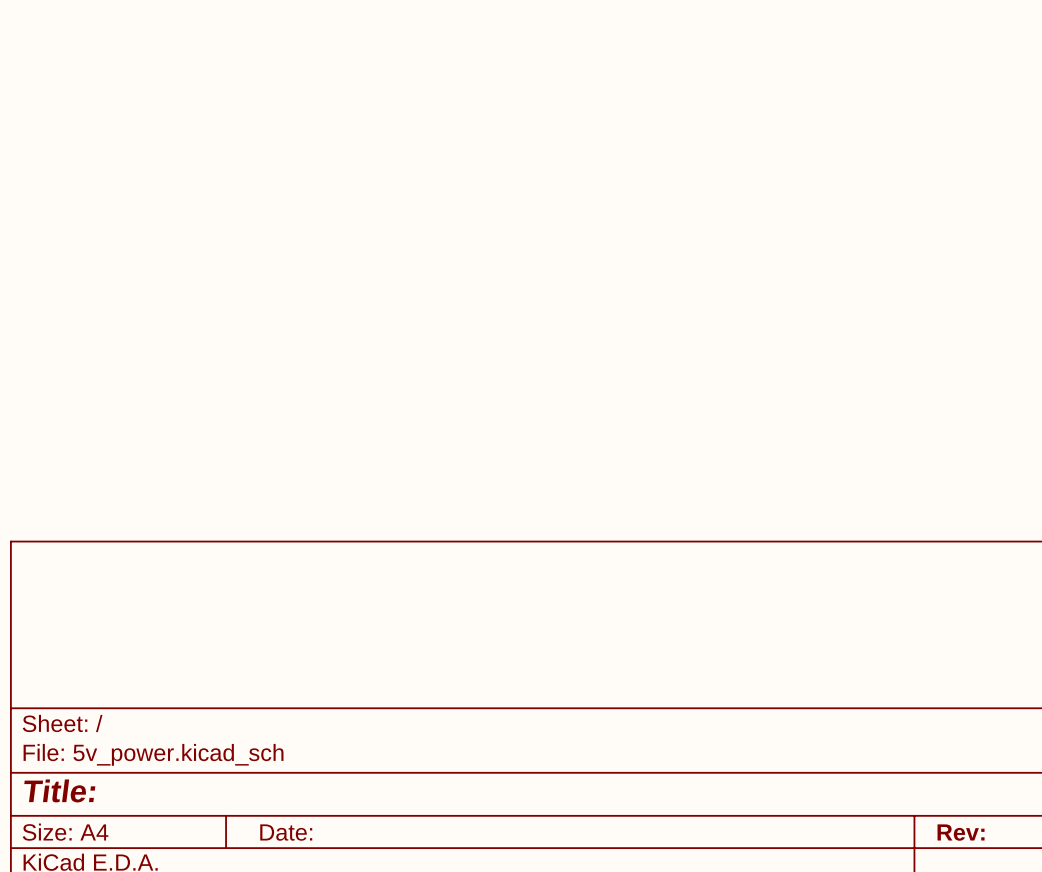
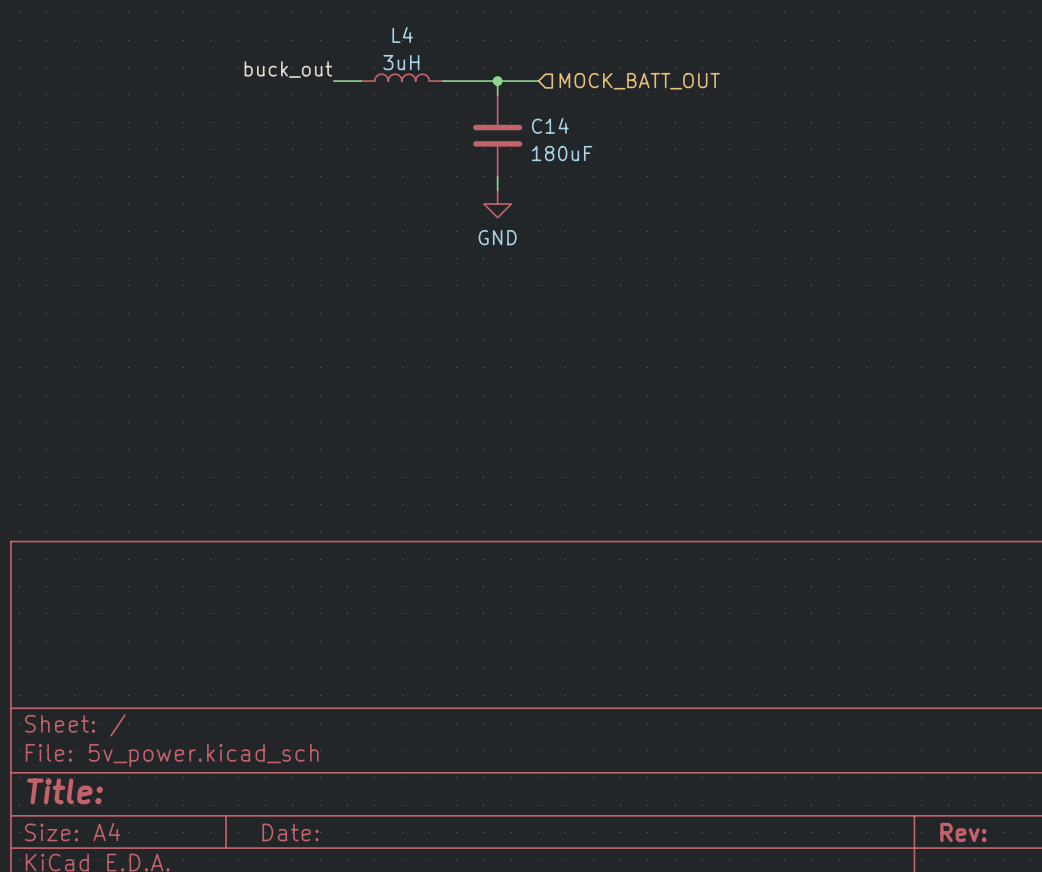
label: none -> buck_out (288, 69)
L4: none -> 3uH (402, 77)
wire: none -> (333, 81) (361, 81)
wire: none -> (443, 81) (538, 81)
wire: none -> (497, 81) (497, 94)
junction: none -> (497, 81)
hierarchical label: none -> MOCK_BATT_OUT (639, 81)
C14: none -> 180uF (497, 135)
wire: none -> (497, 176) (497, 190)
power symbol: none -> GND (497, 204)

